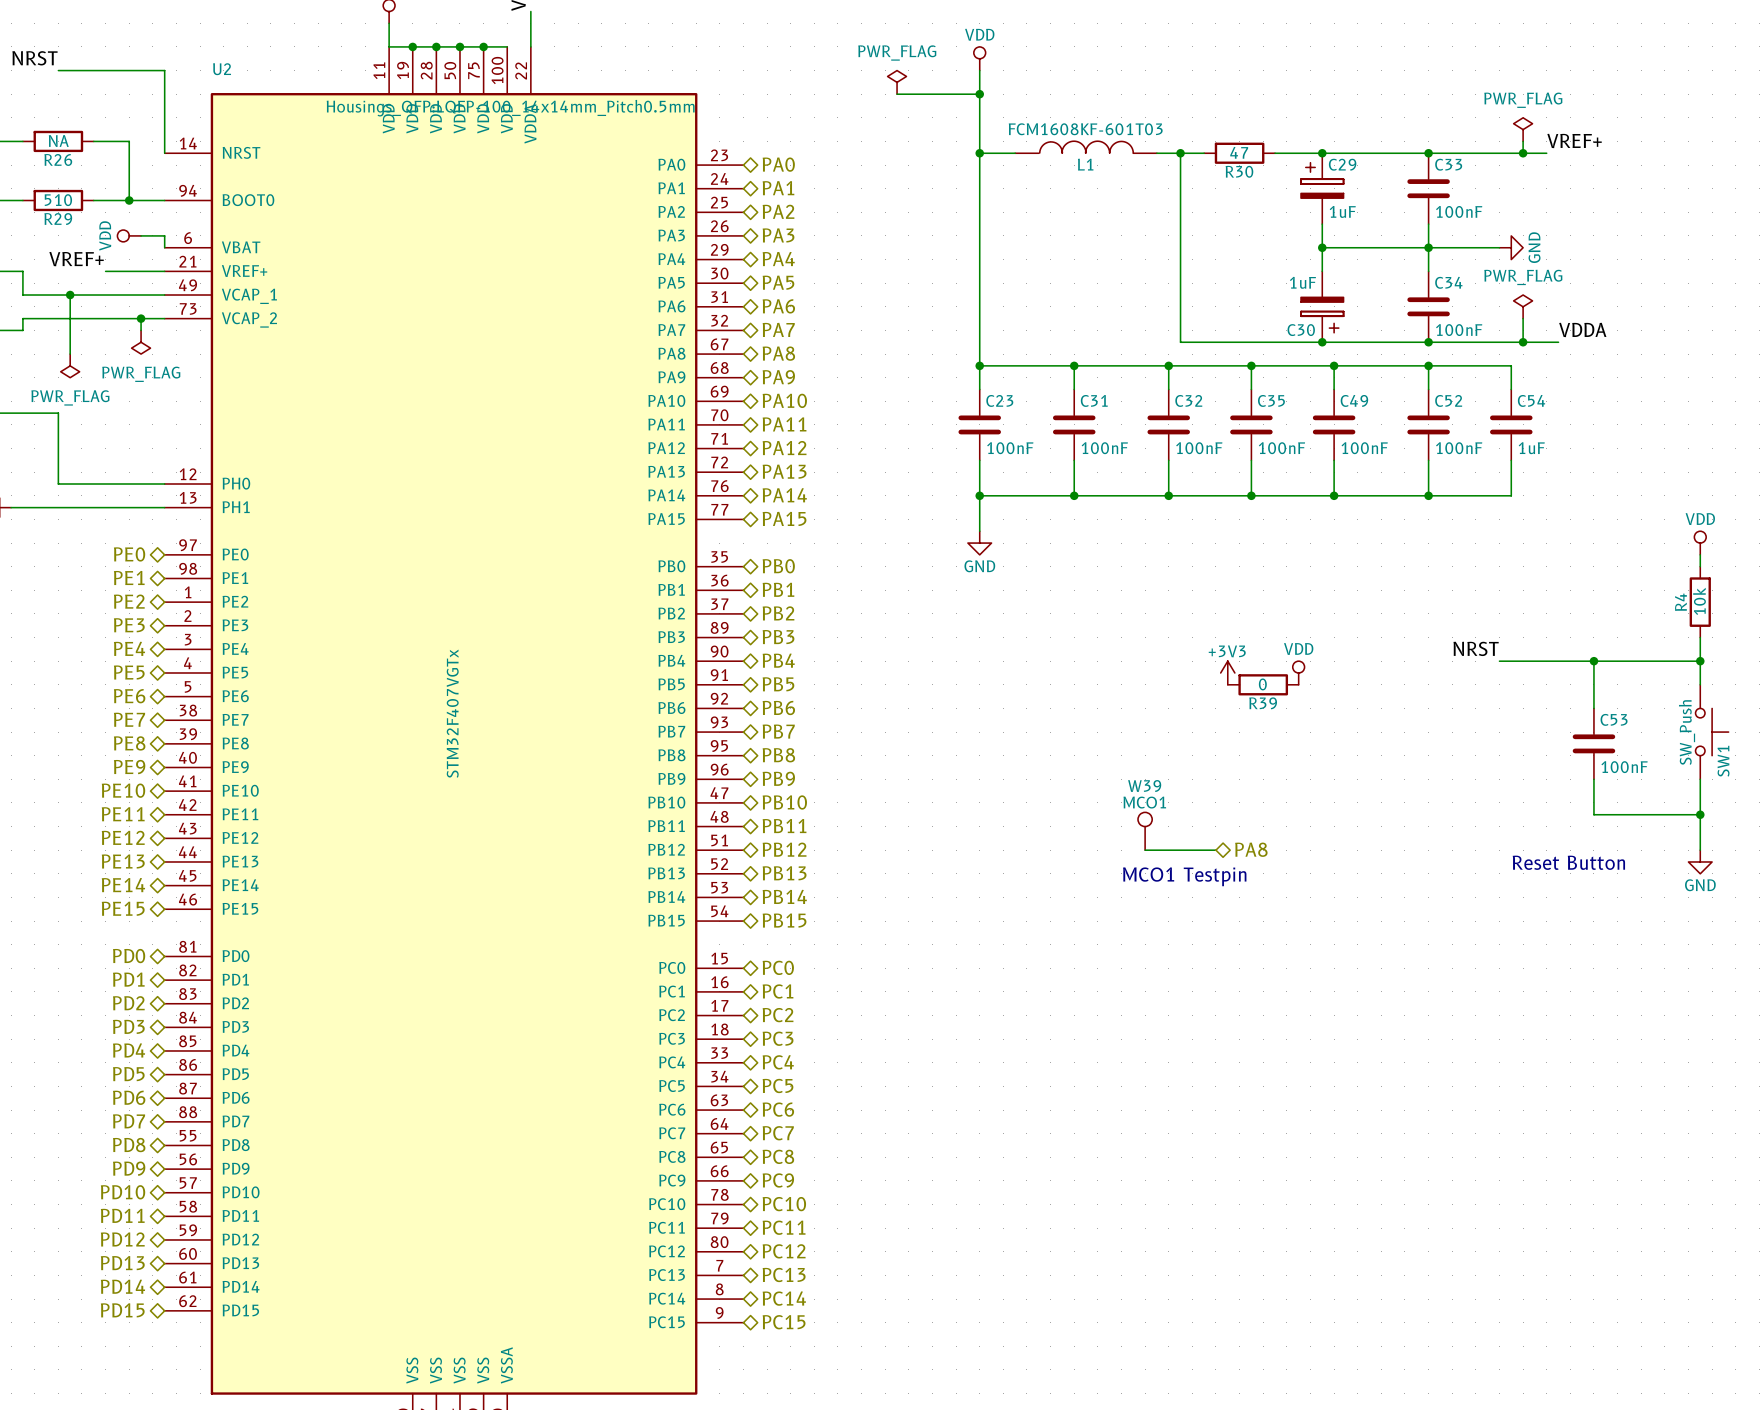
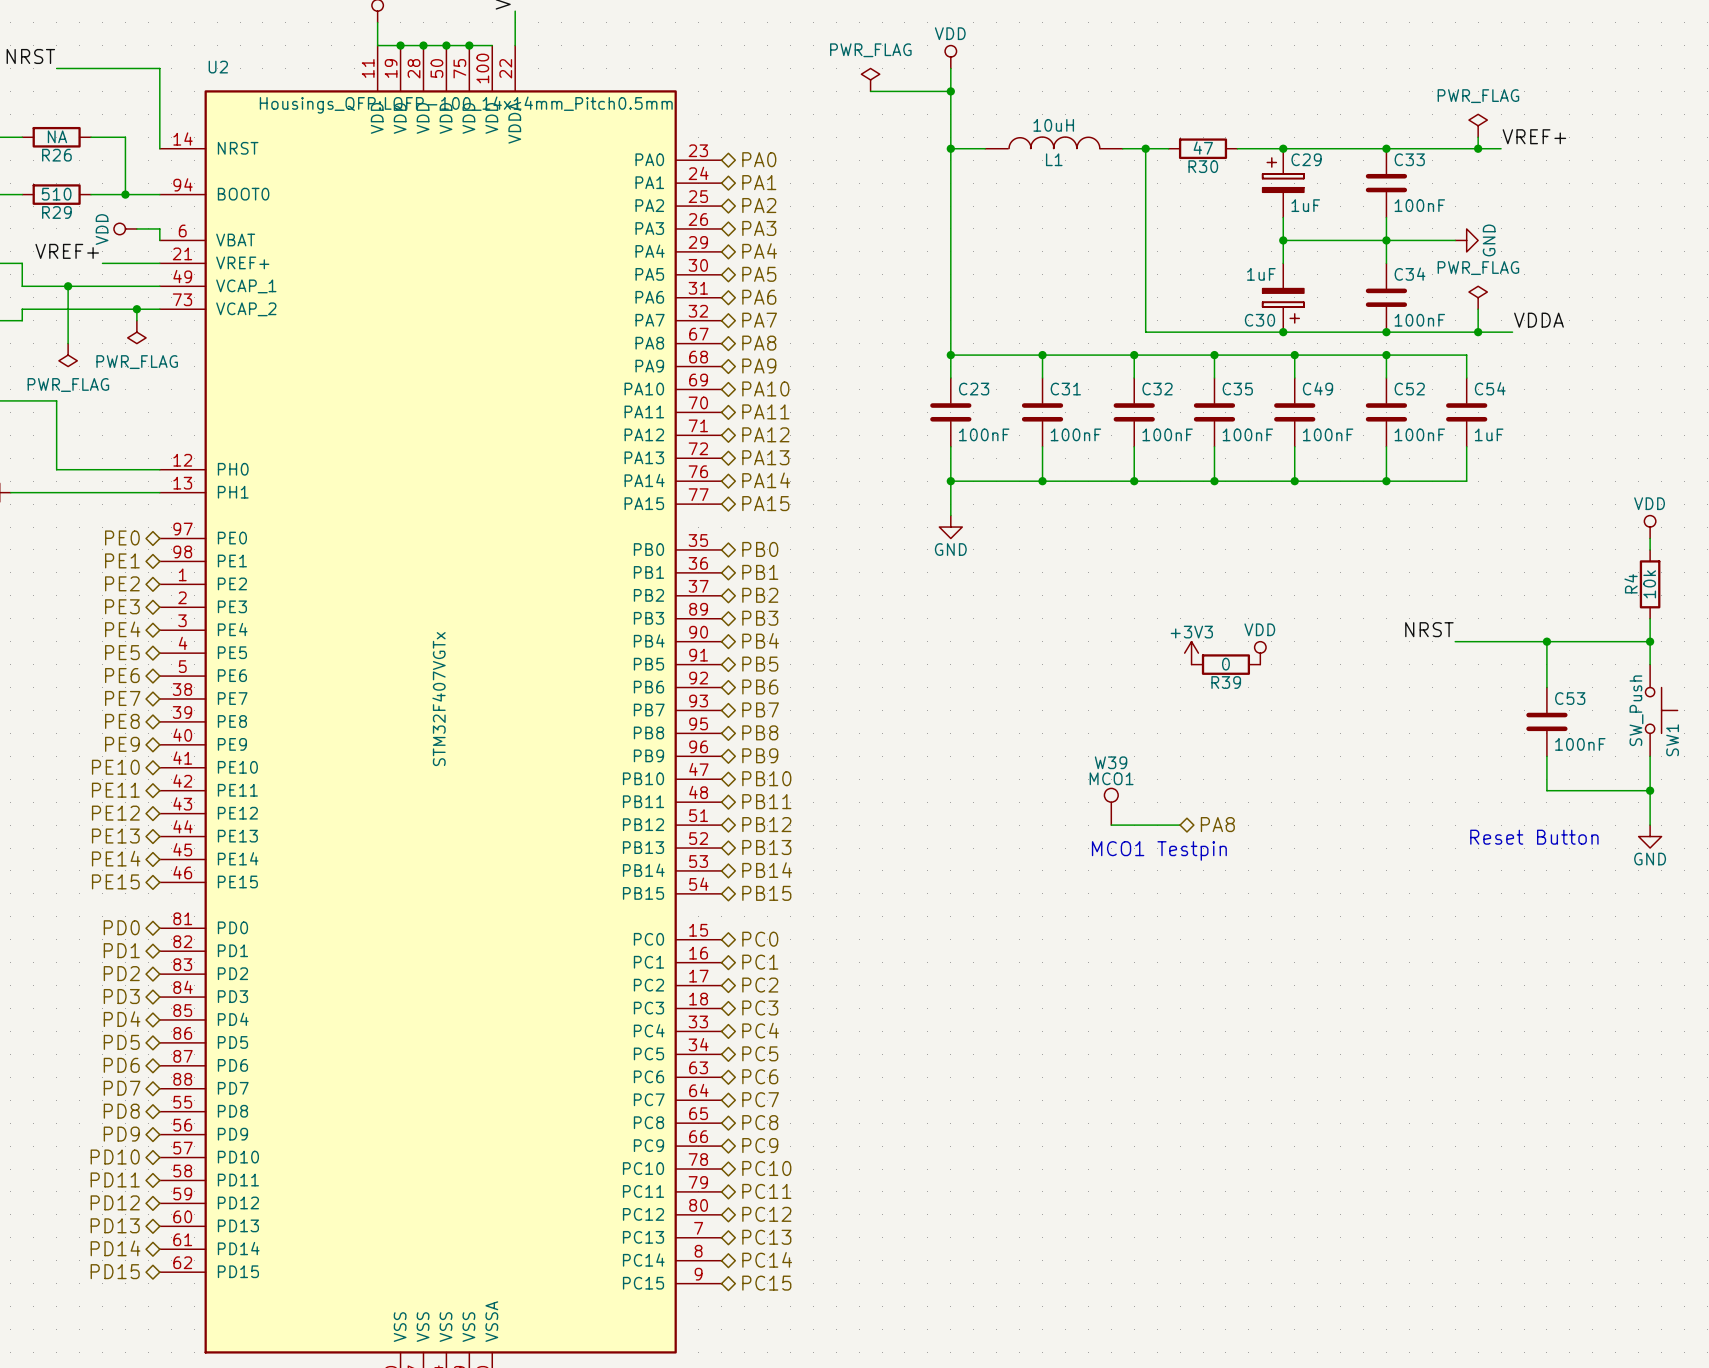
L1 value: FCM1608KF-601T03 (1085, 129) -> 10uH (1053, 125)

